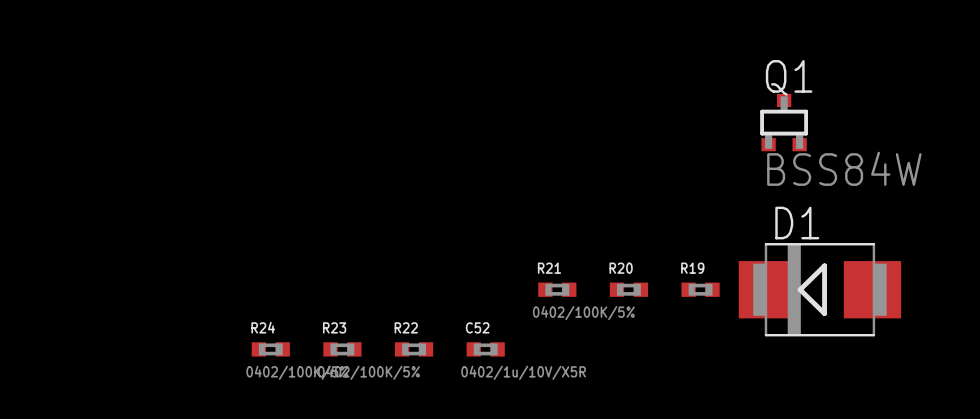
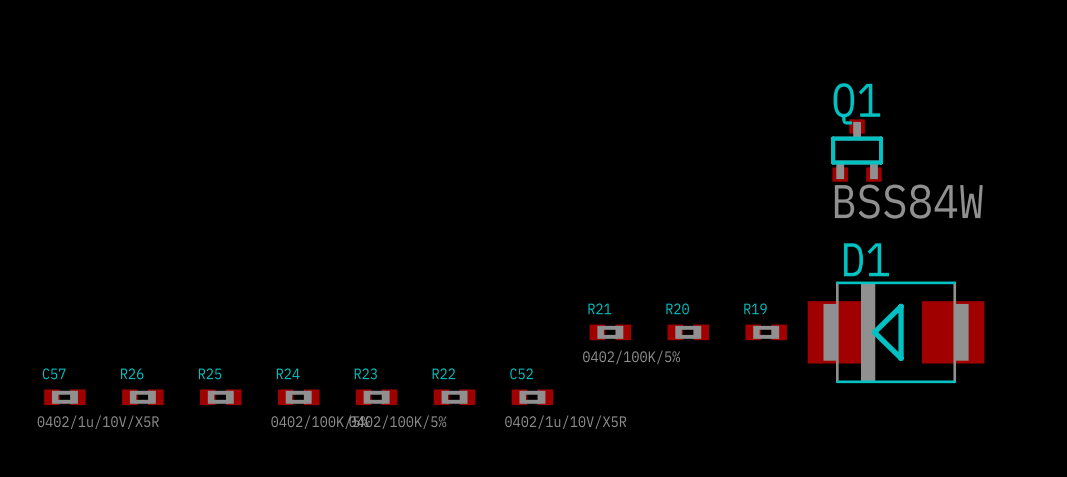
C57: none -> 0402/1u/10V/X5R (64, 397)
R26: none -> (142, 397)
R25: none -> (220, 397)

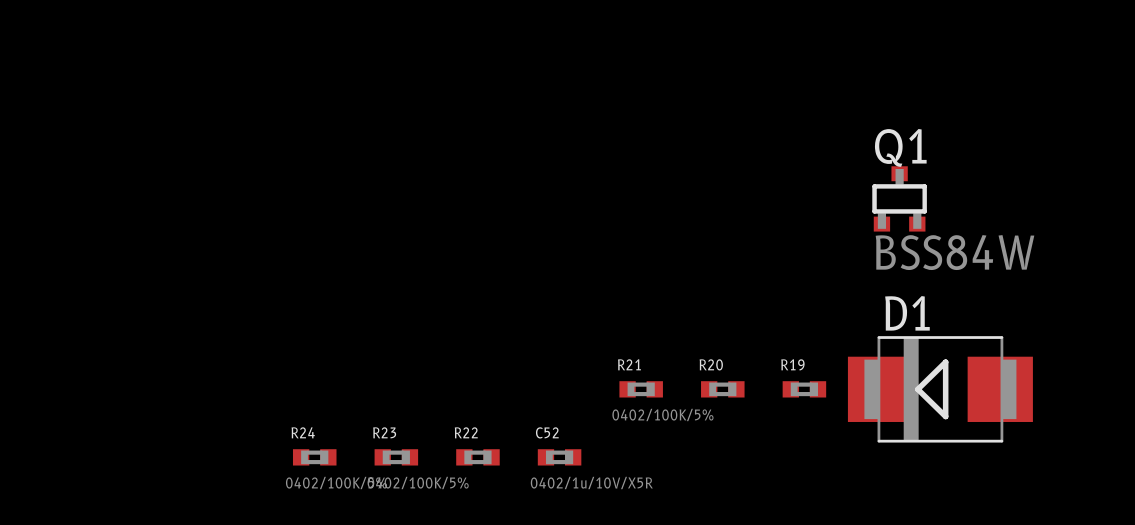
C57: 0402/1u/10V/X5R (64, 397) -> none
R26: (142, 397) -> none
R25: (220, 397) -> none

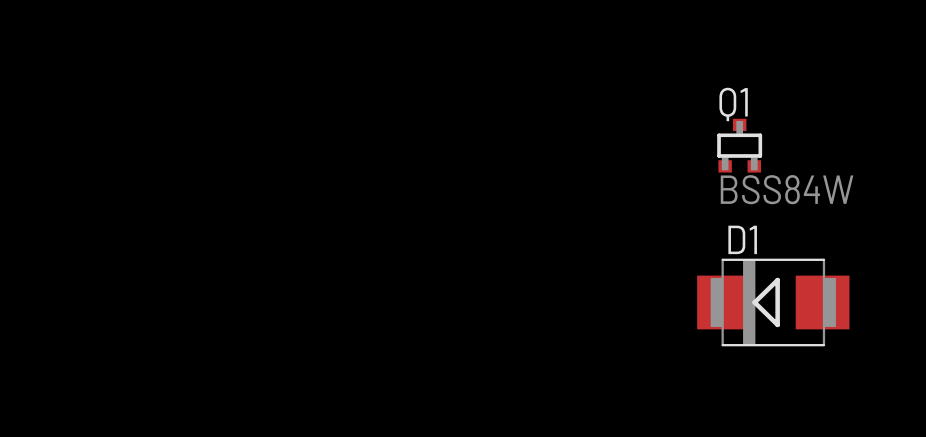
R21: 0402/100K/5% (641, 389) -> none
R20: (722, 389) -> none
R19: (804, 389) -> none
R24: 0402/100K/5% (314, 457) -> none
R23: 0402/100K/5% (396, 457) -> none
R22: (477, 457) -> none
C52: 0402/1u/10V/X5R (559, 457) -> none

